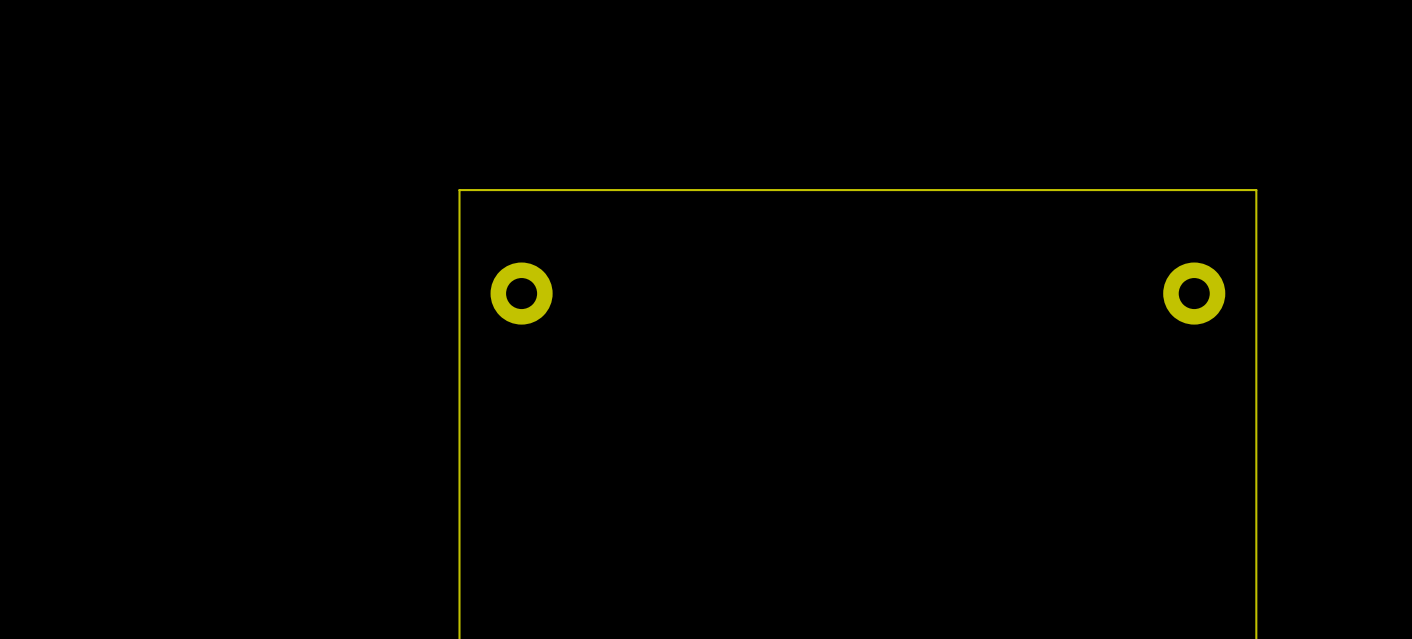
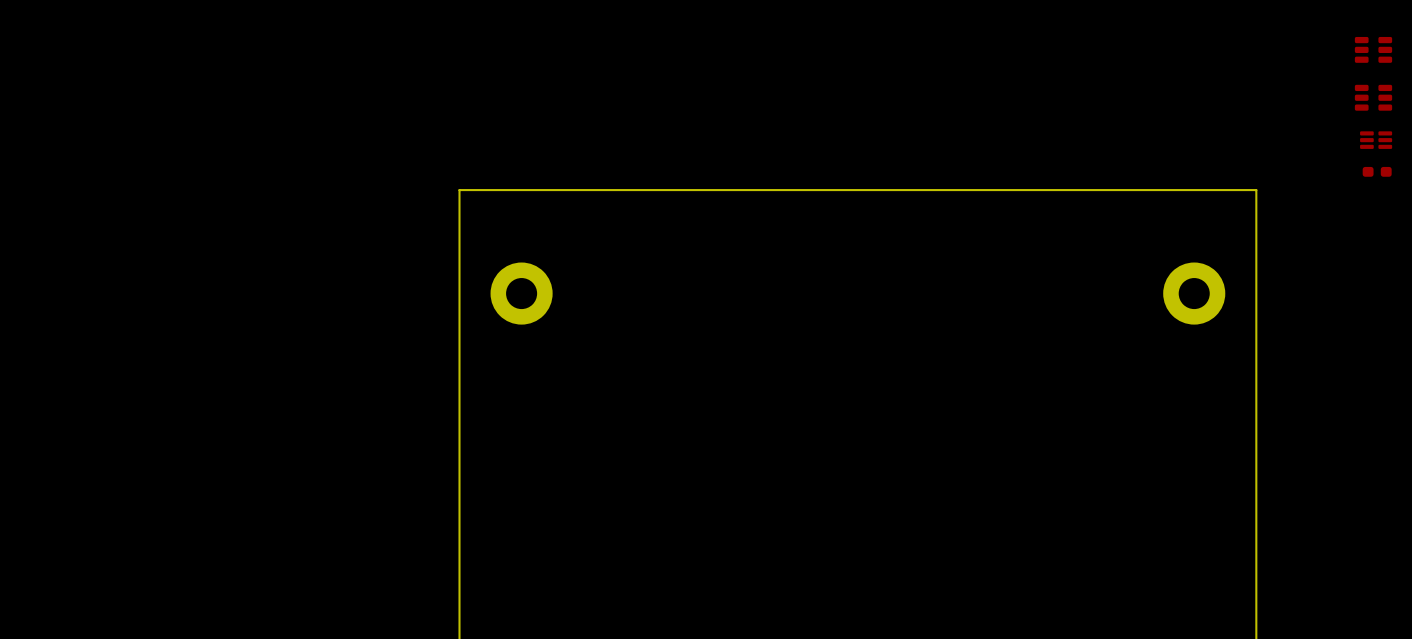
part: none -> (1373, 49)
part: none -> (1373, 97)
part: none -> (1376, 140)
part: none -> (1377, 171)

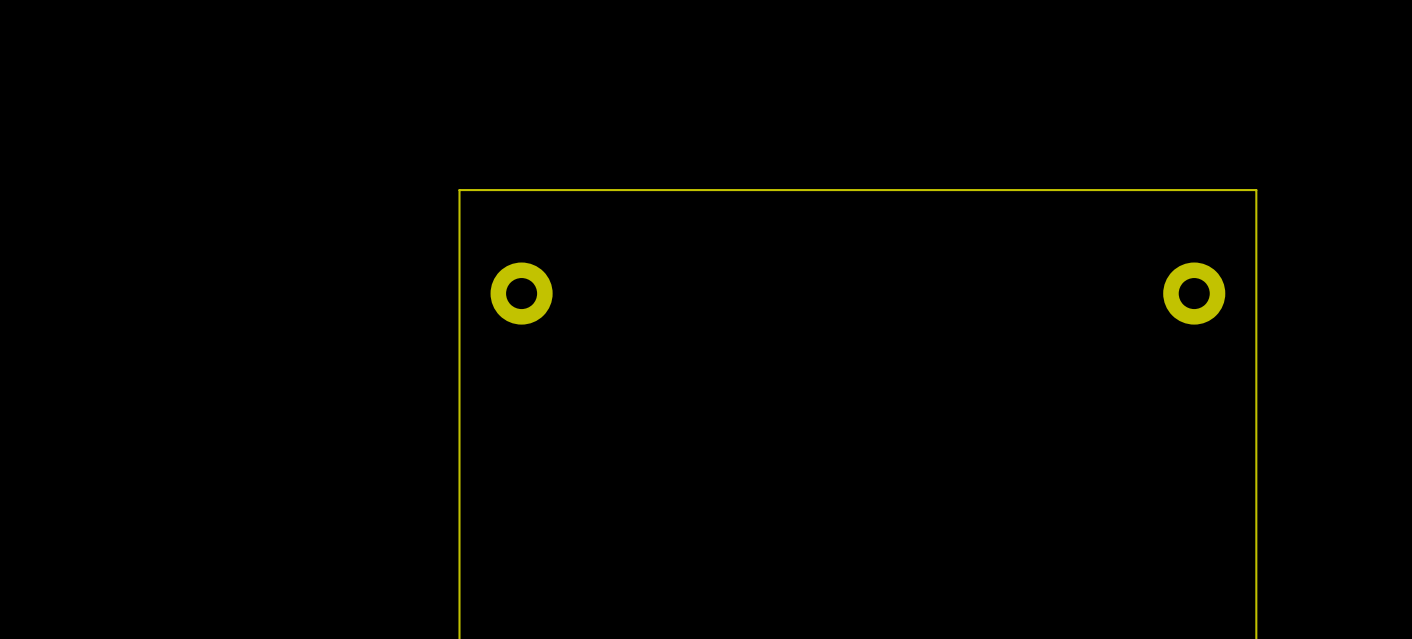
part: (1373, 49) -> none
part: (1373, 97) -> none
part: (1376, 140) -> none
part: (1377, 171) -> none

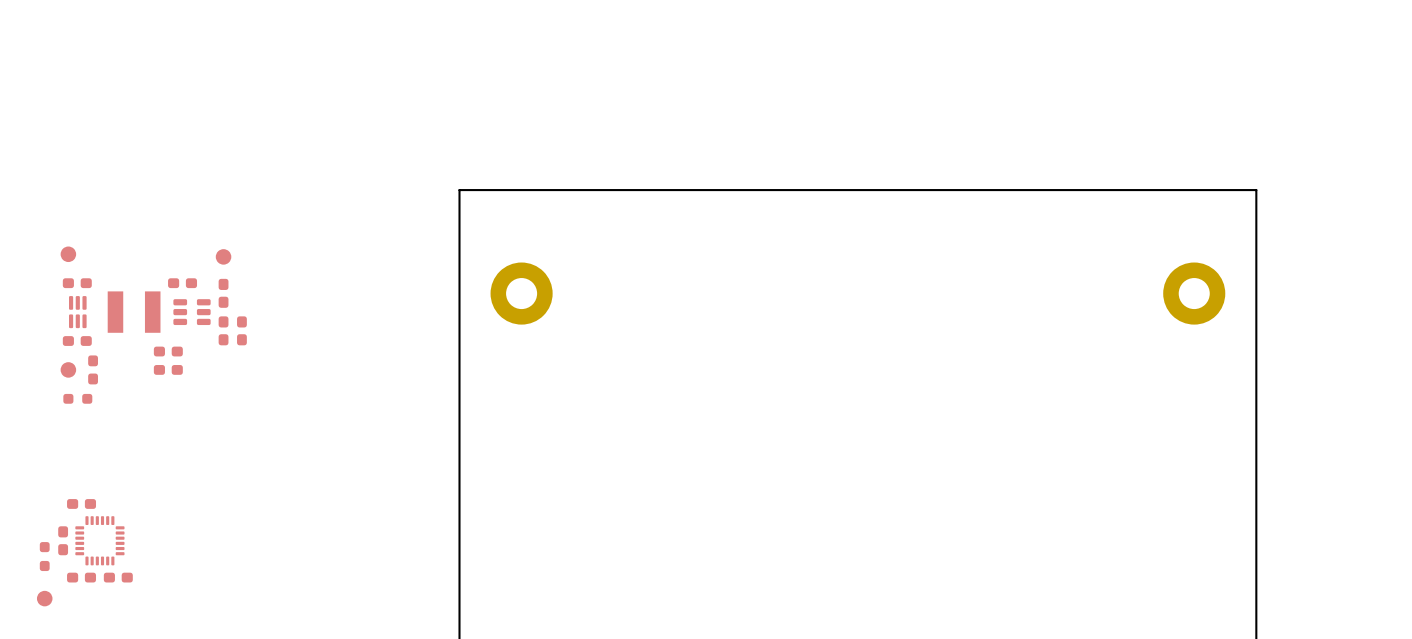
part: none -> (68, 254)
part: none -> (223, 256)
part: none -> (77, 283)
part: none -> (182, 283)
part: none -> (223, 293)
part: none -> (77, 312)
part: none -> (134, 312)
part: none -> (192, 312)
part: none -> (223, 330)
part: none -> (241, 330)
part: none -> (77, 341)
part: none -> (168, 351)
part: none -> (68, 369)
part: none -> (93, 369)
part: none -> (168, 369)
part: none -> (77, 398)
part: none -> (81, 503)
part: none -> (63, 540)
part: none -> (99, 540)
part: none -> (44, 556)
part: none -> (81, 577)
part: none -> (118, 577)
part: none -> (44, 598)

